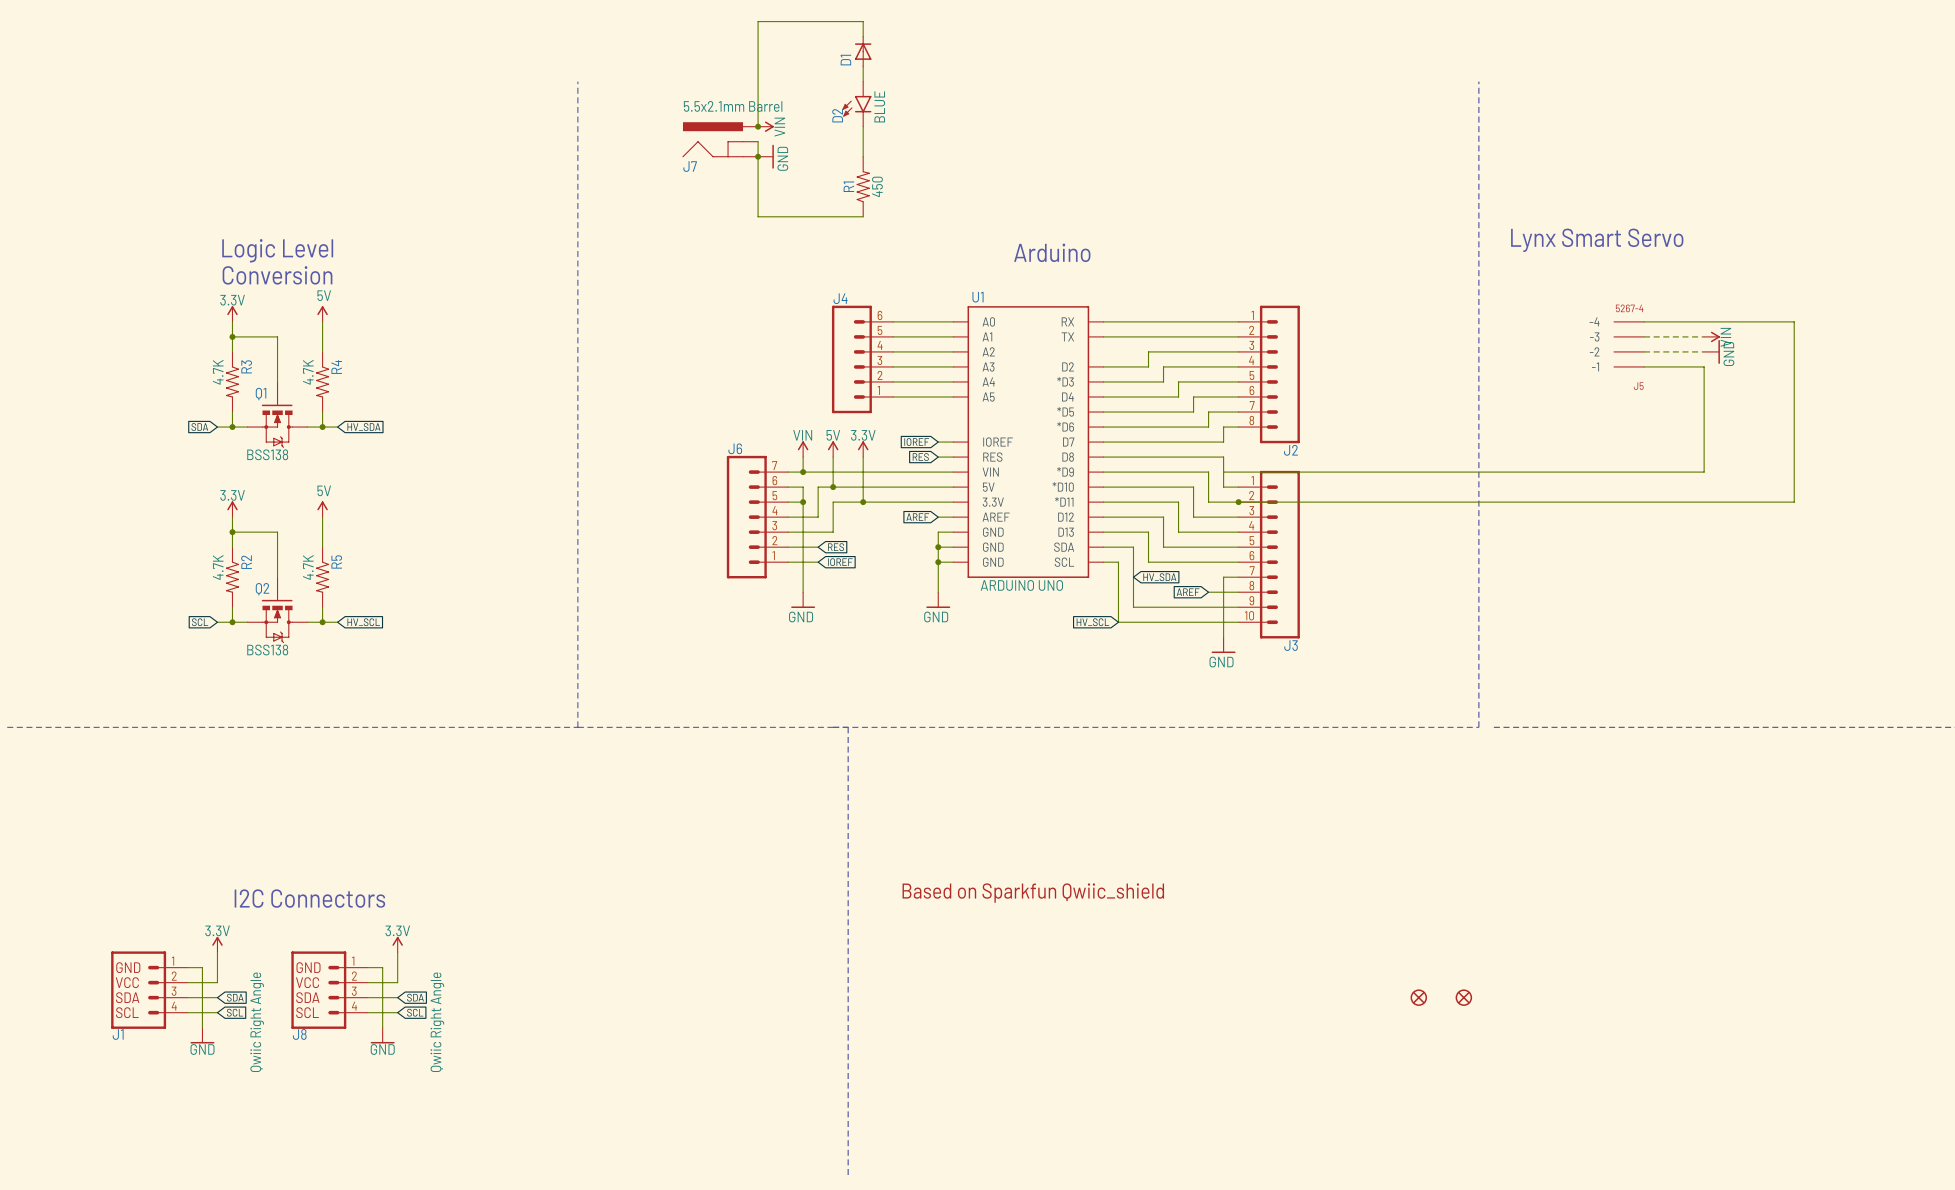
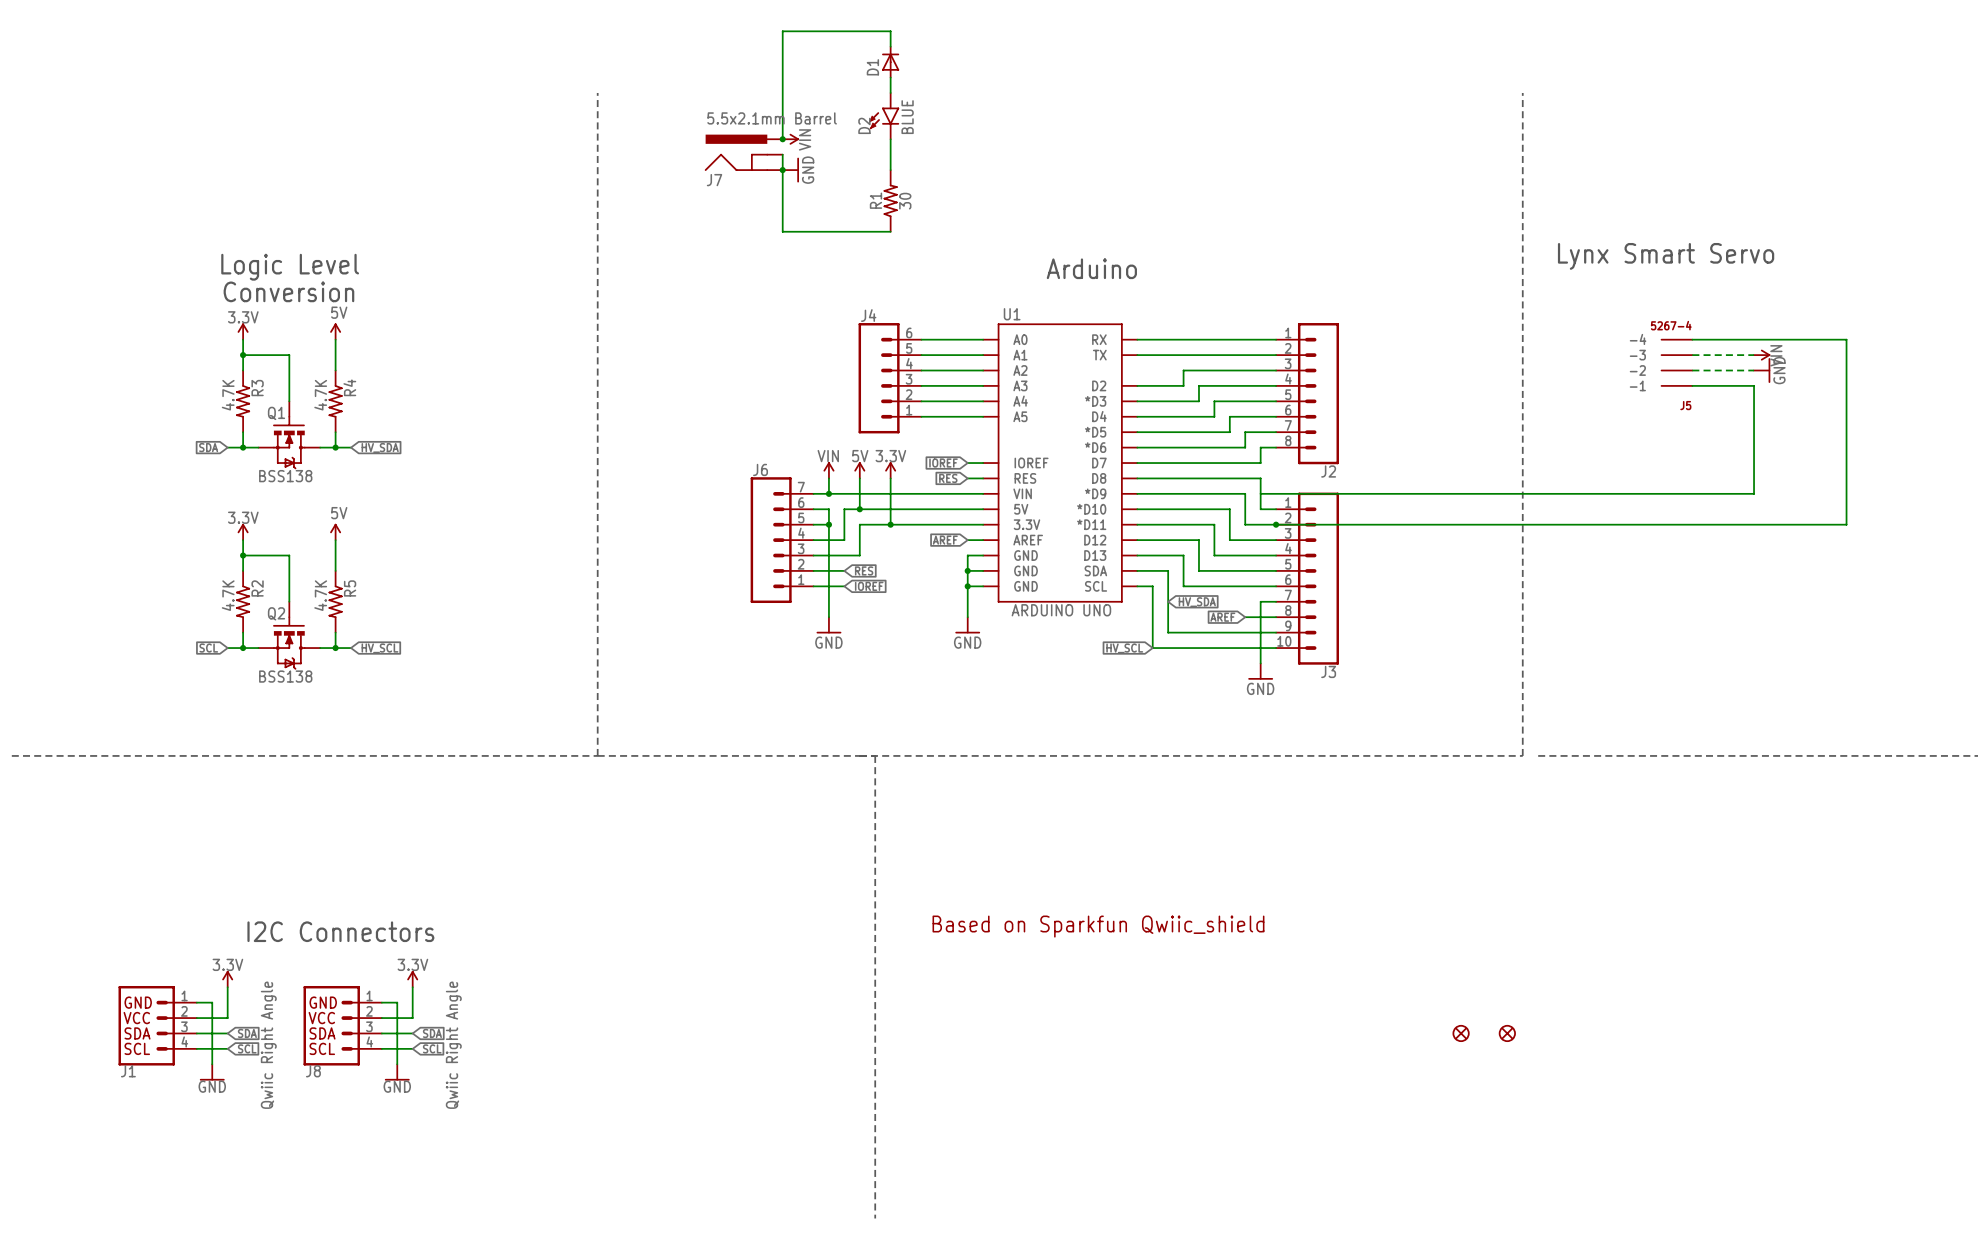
R1 value: 450 (877, 186) -> 30 (905, 201)

